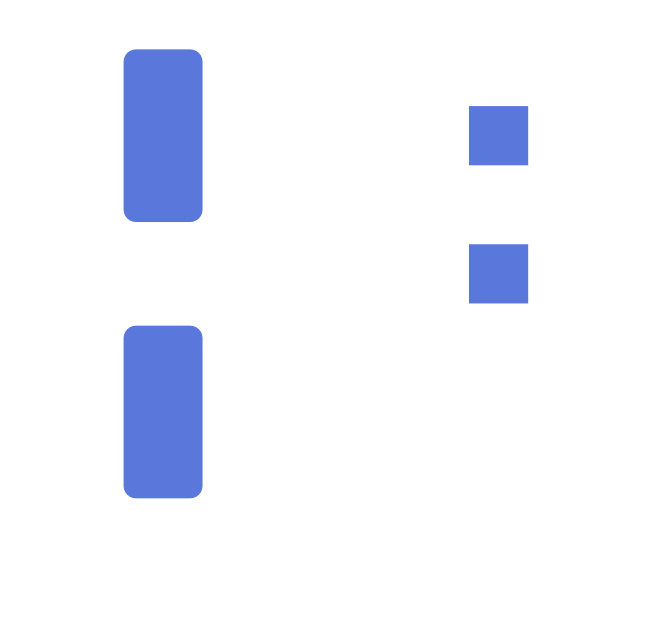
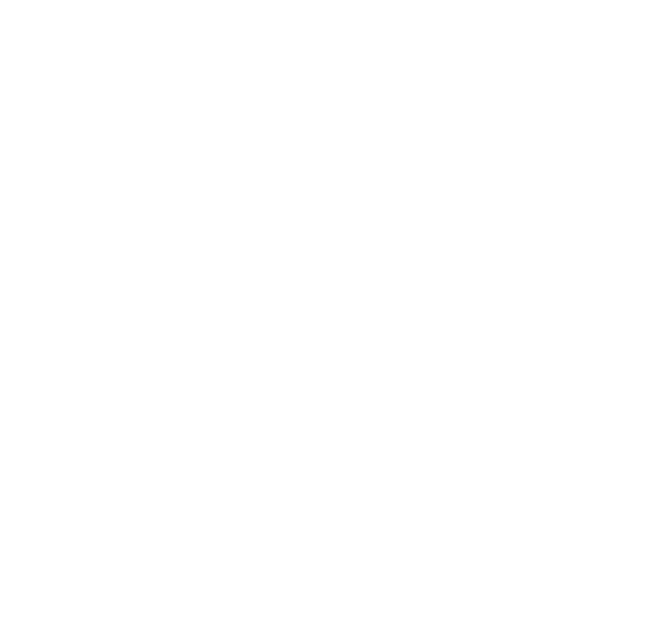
part: (498, 204) -> none
part: (163, 273) -> none

